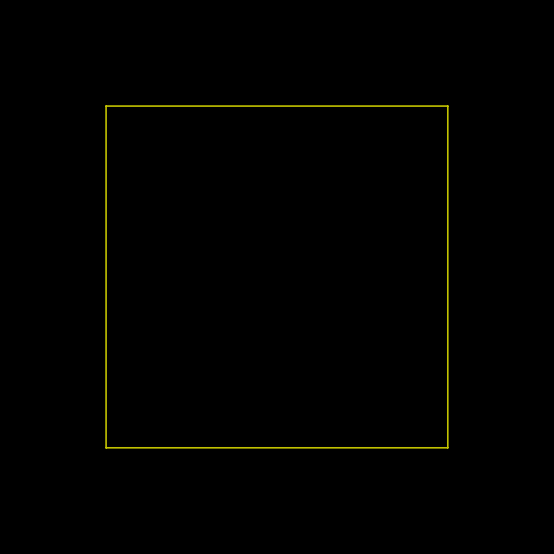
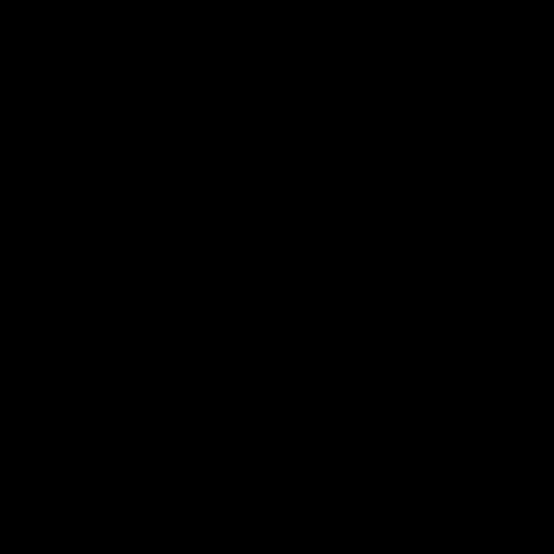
board edge: (447, 106) (106, 106) (106, 447) (447, 447) (447, 106) -> none

